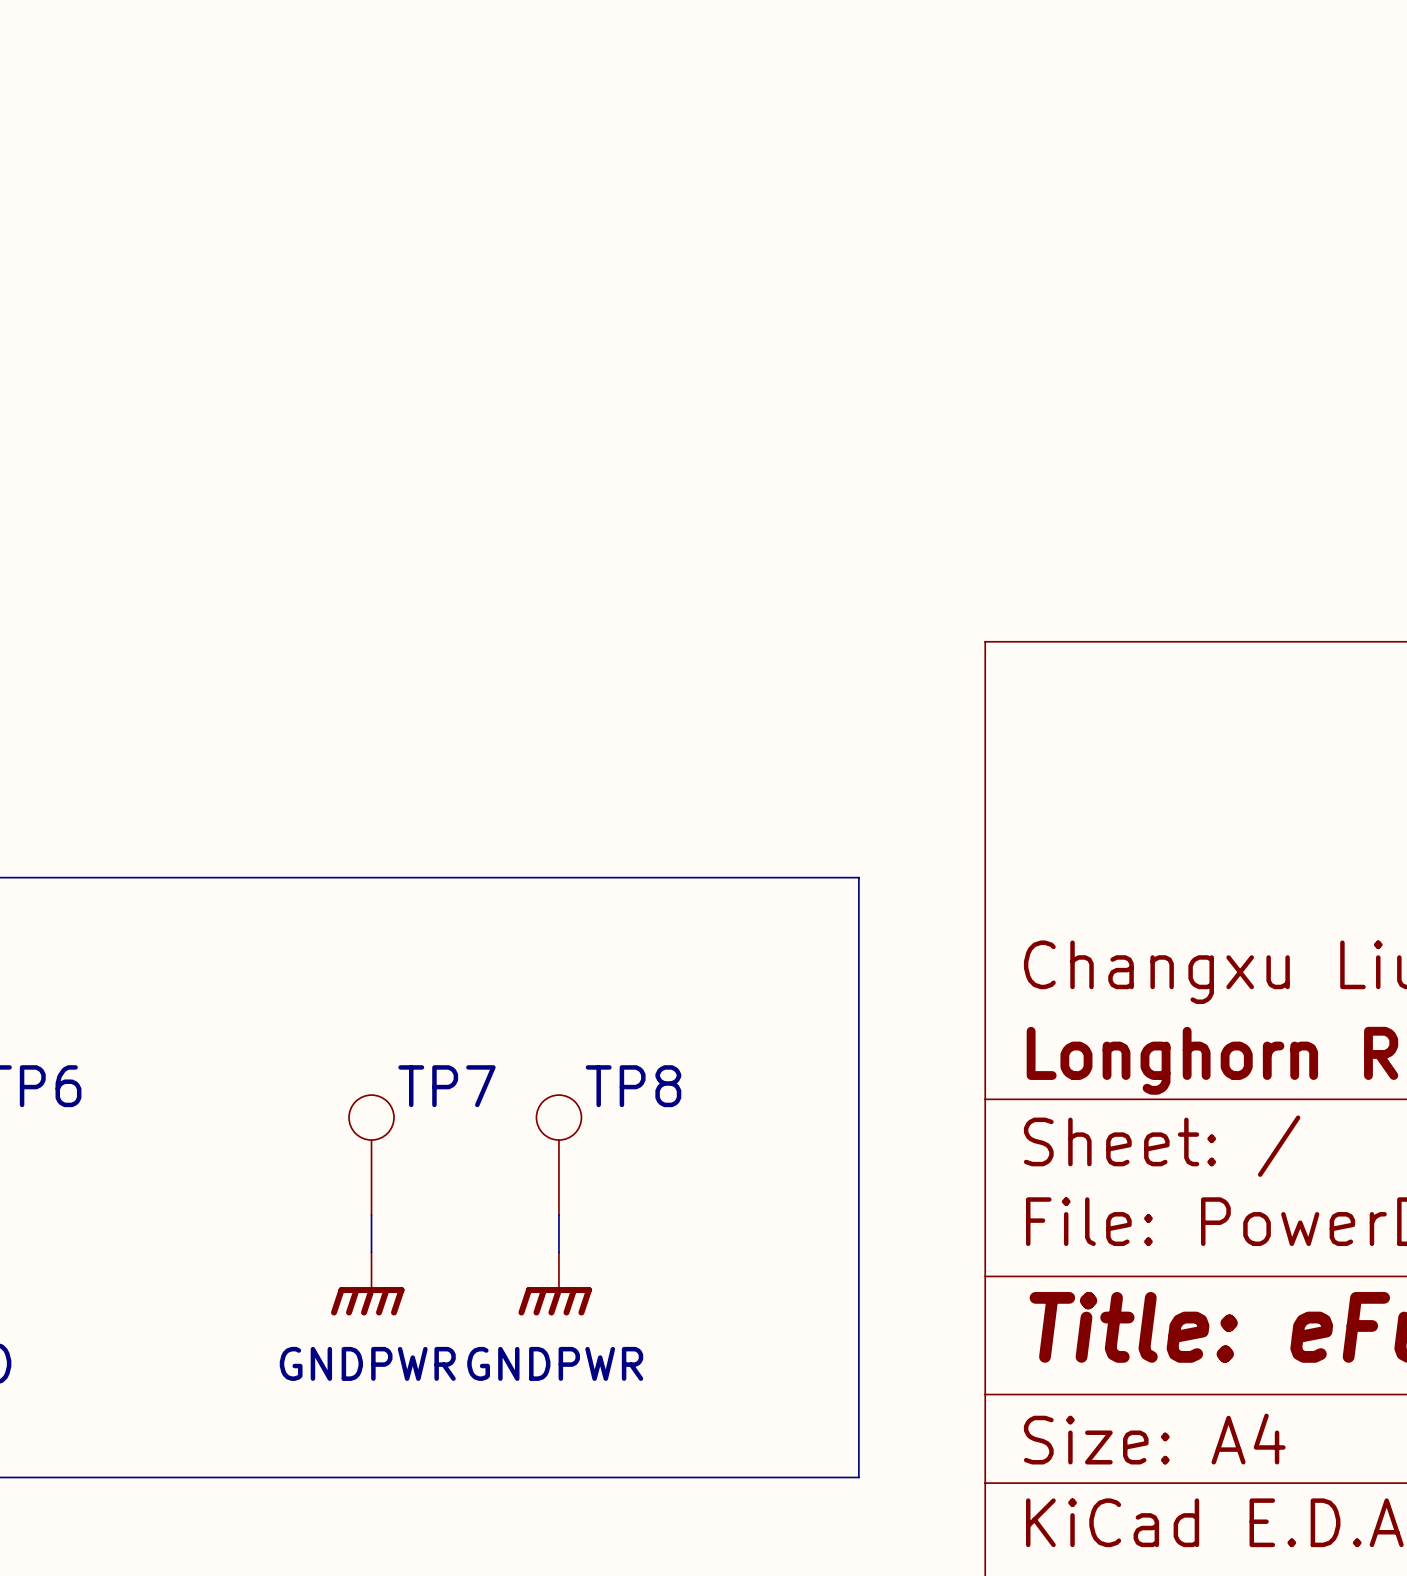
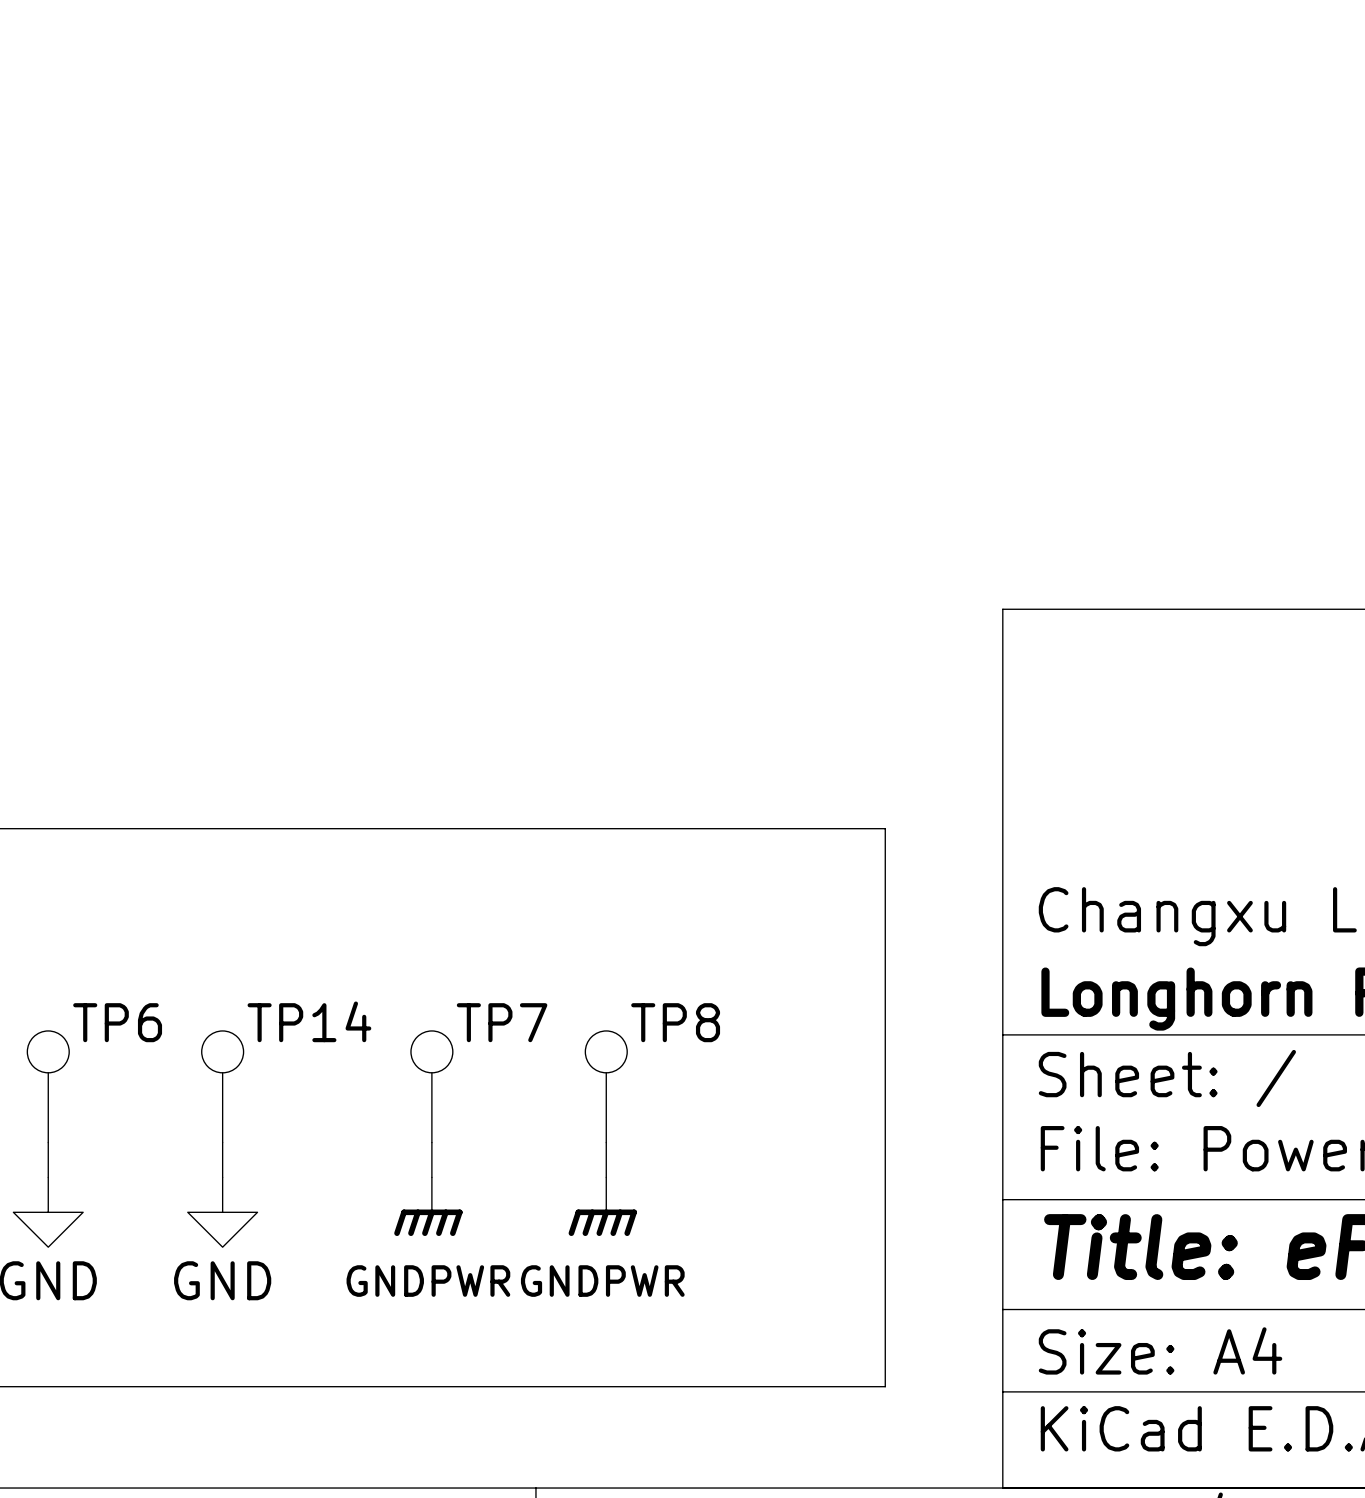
TP14: none -> (222, 1086)
wire: none -> (222, 1142) (222, 1177)
power symbol: none -> GND (222, 1212)

